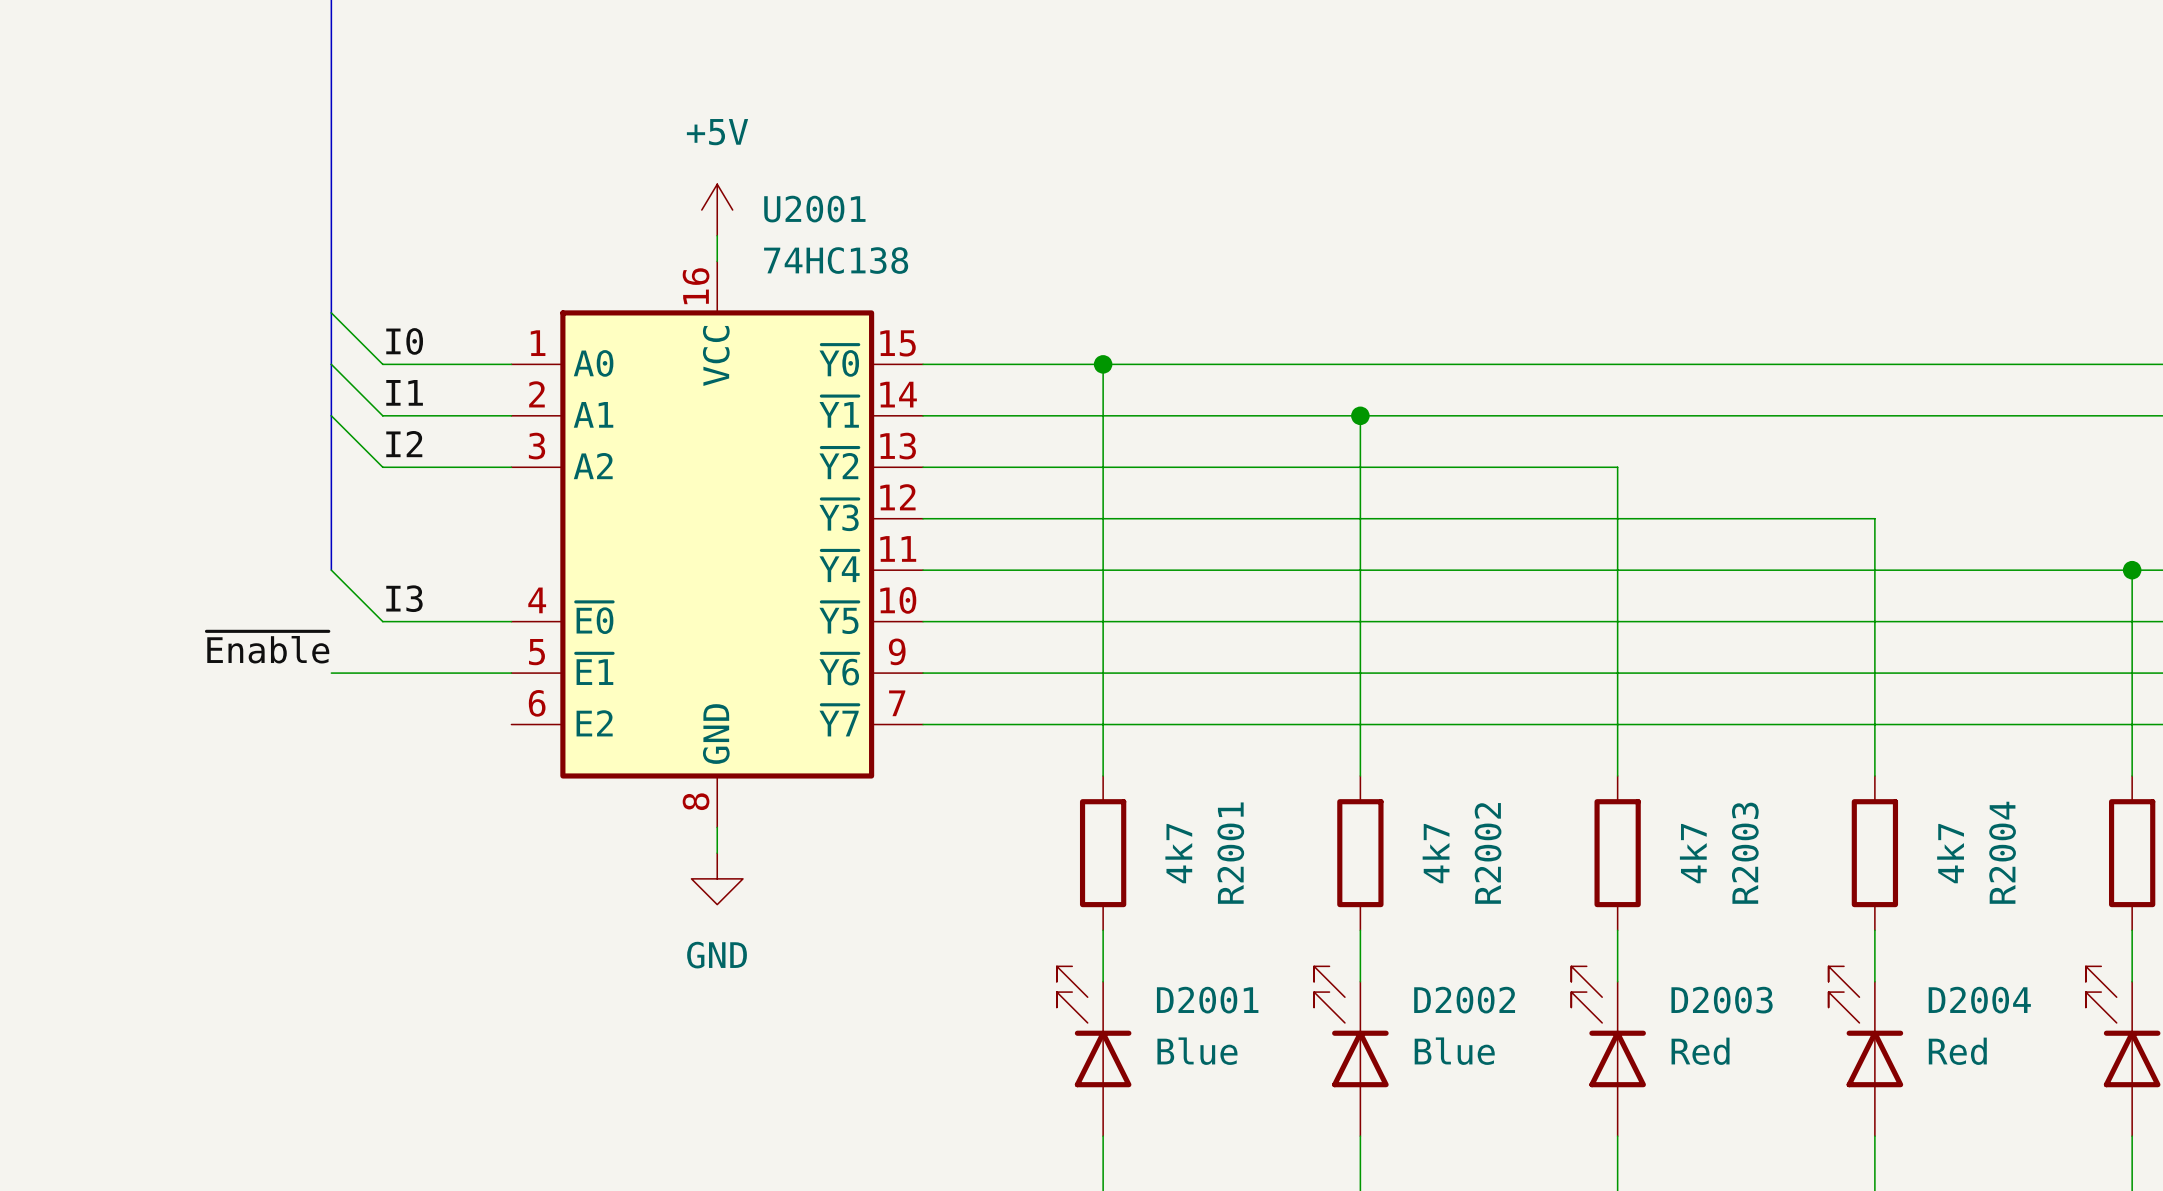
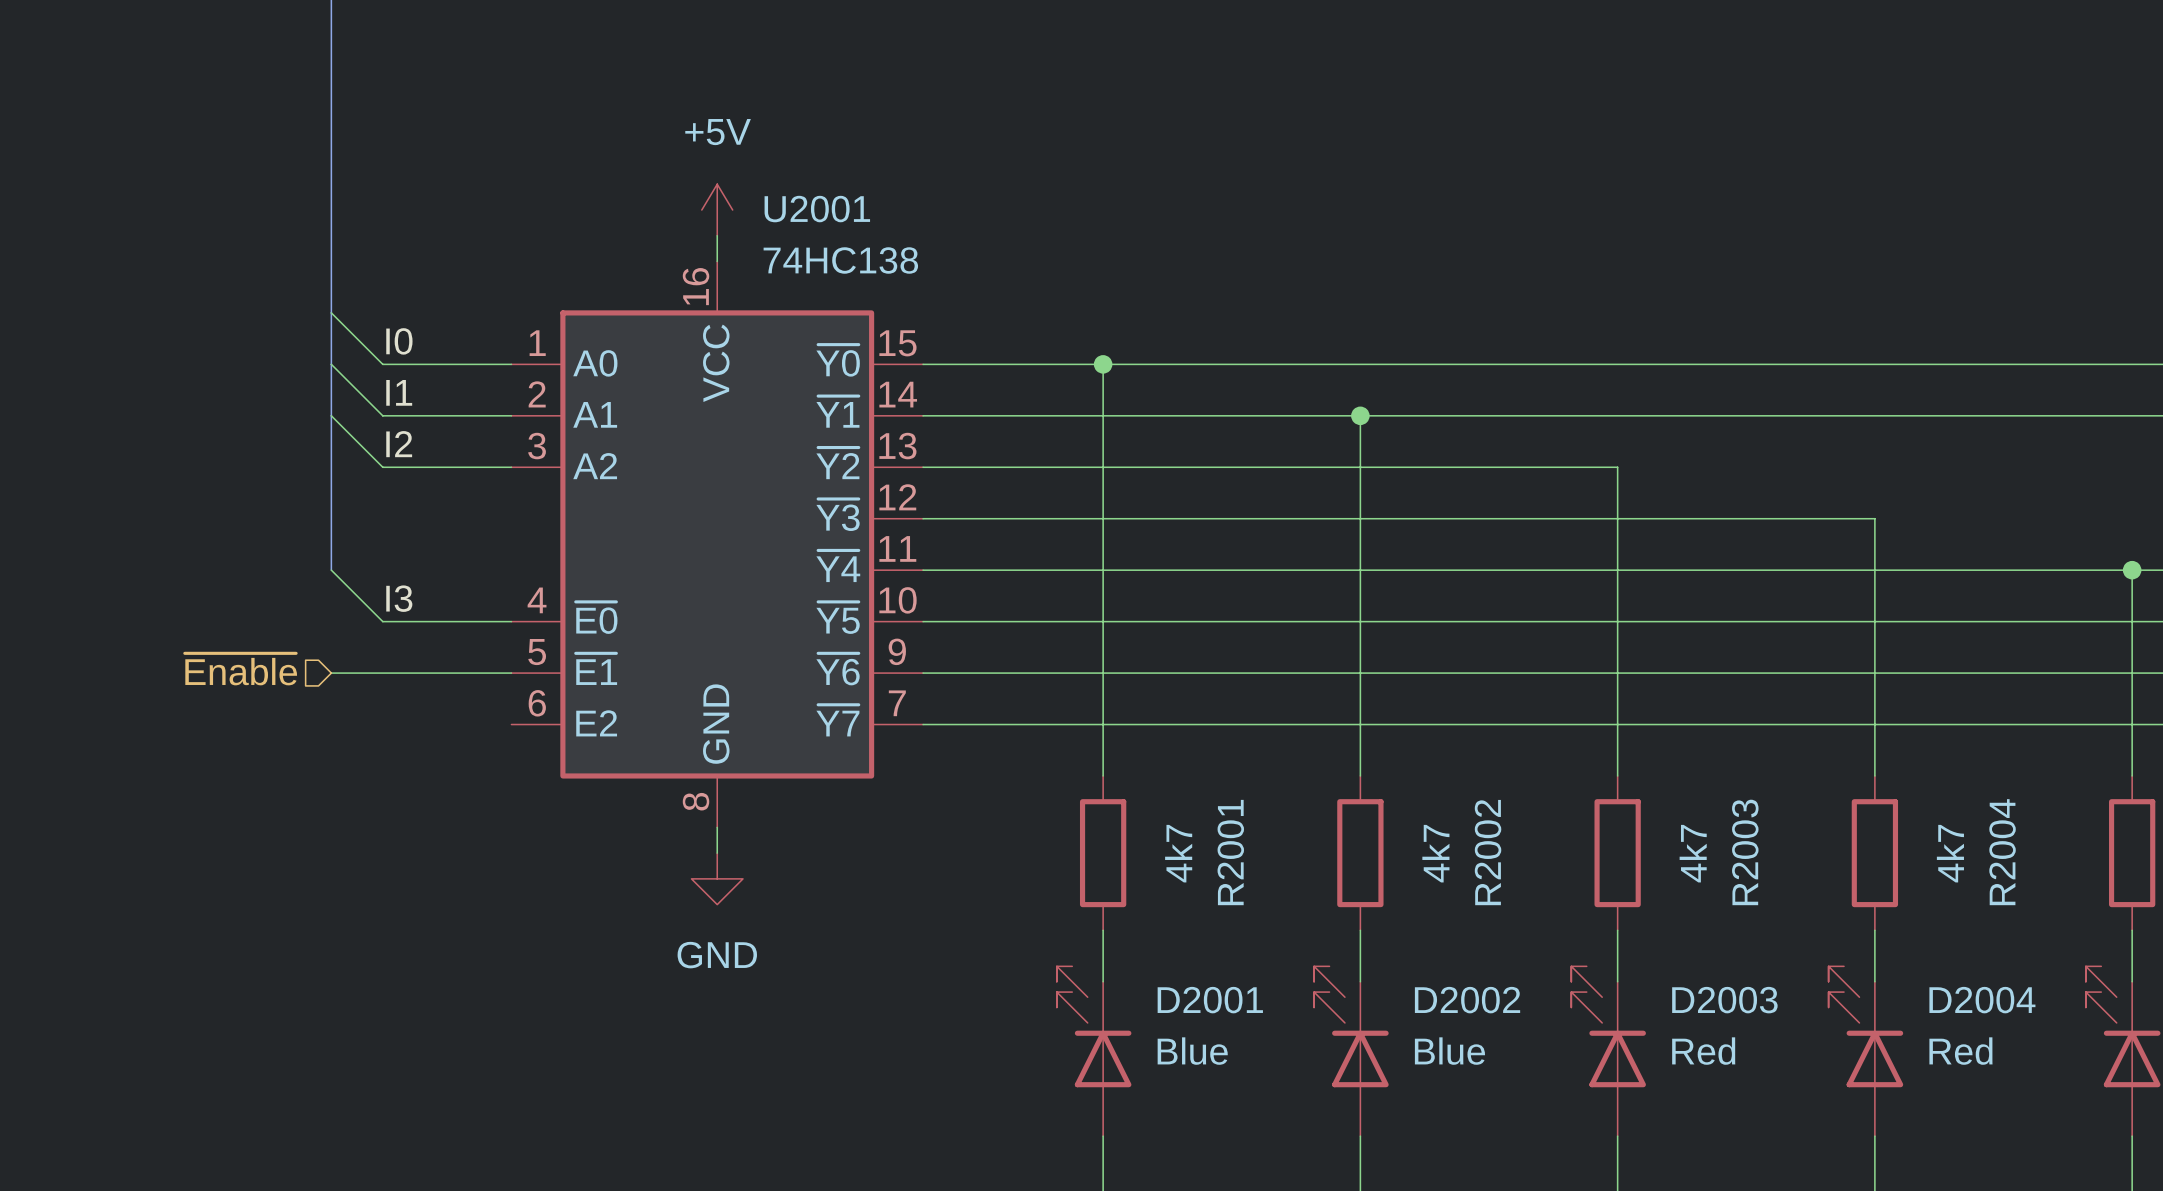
label: ~{Enable} (267, 647) -> none
hierarchical label: none -> ~{Enable} (240, 669)

